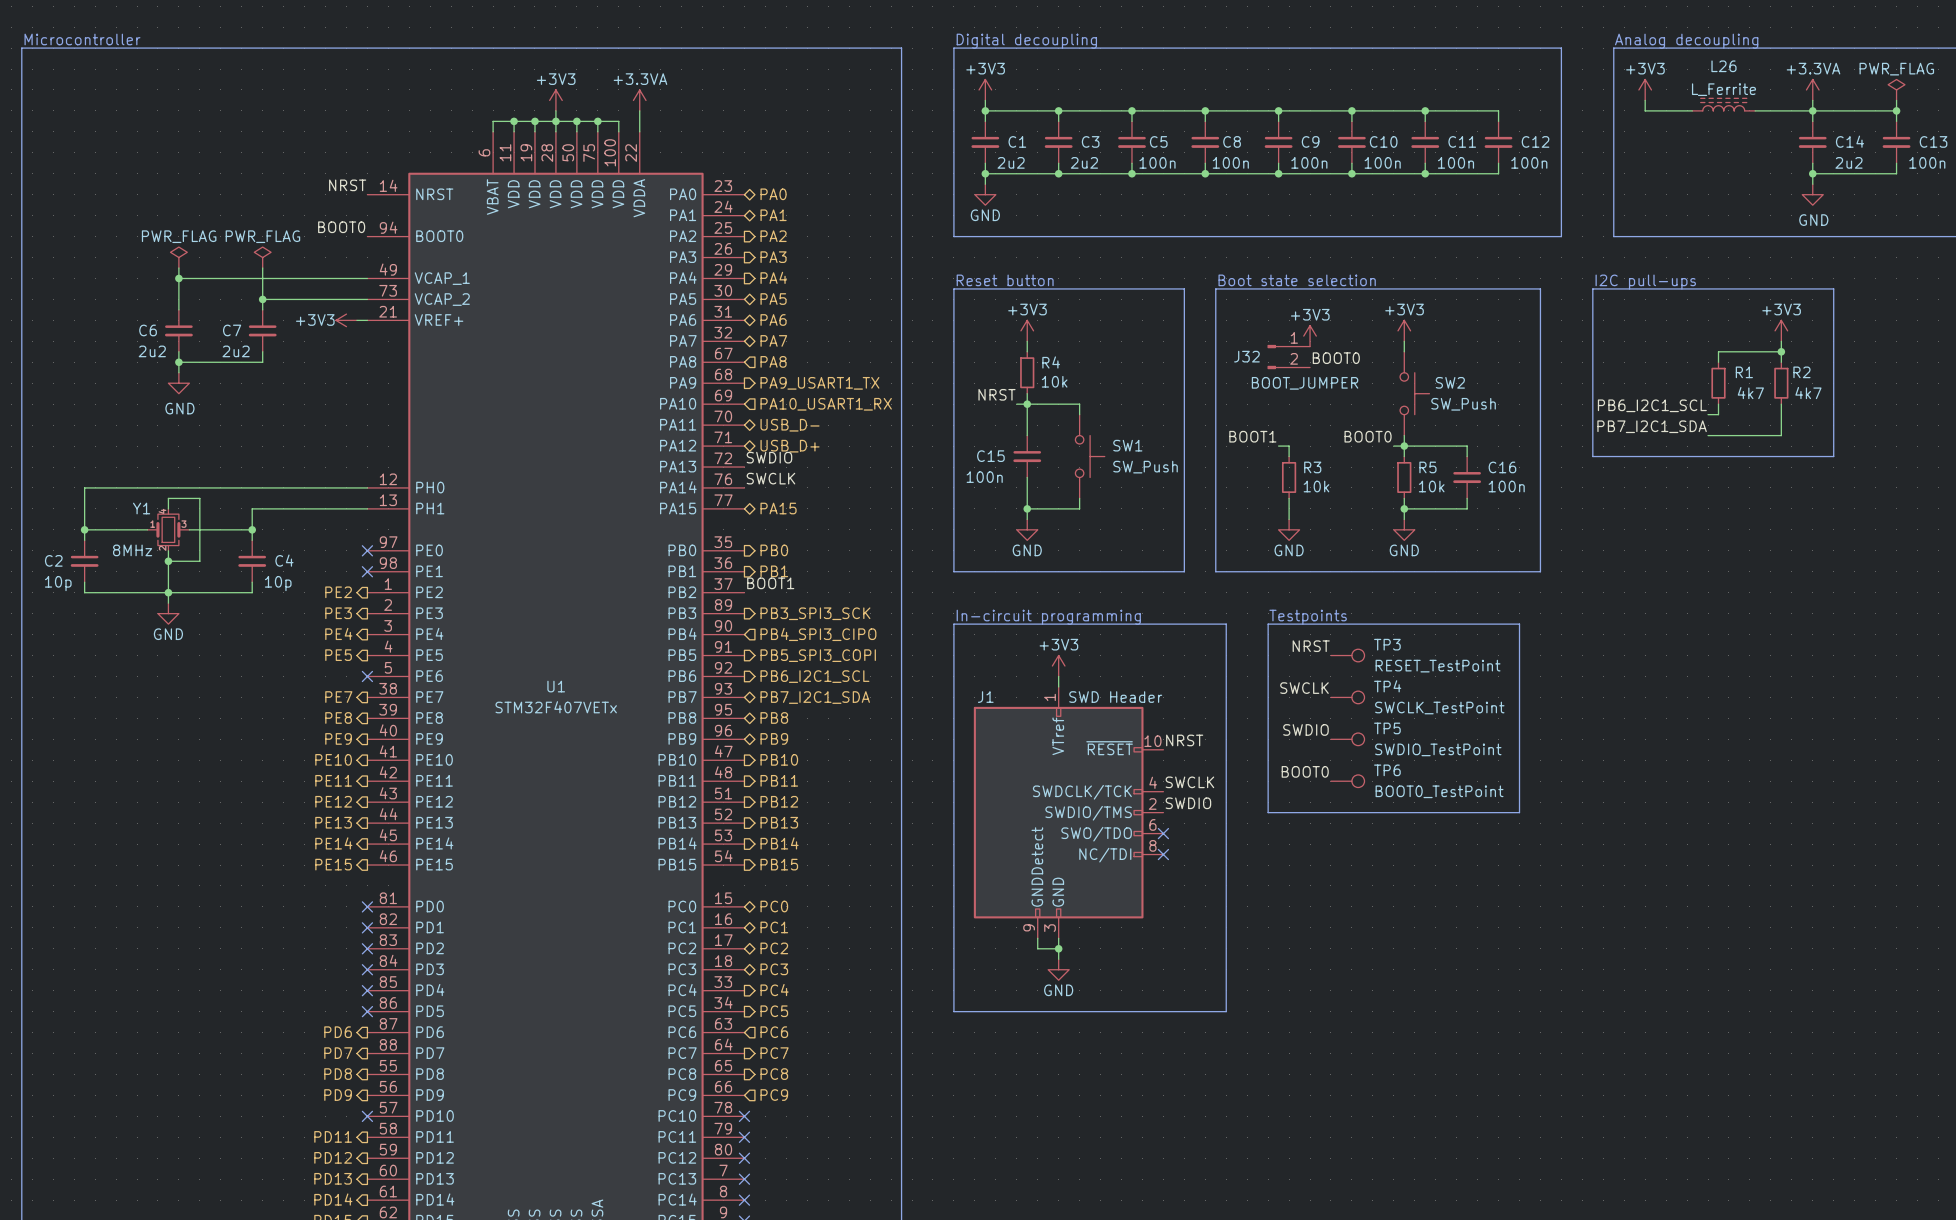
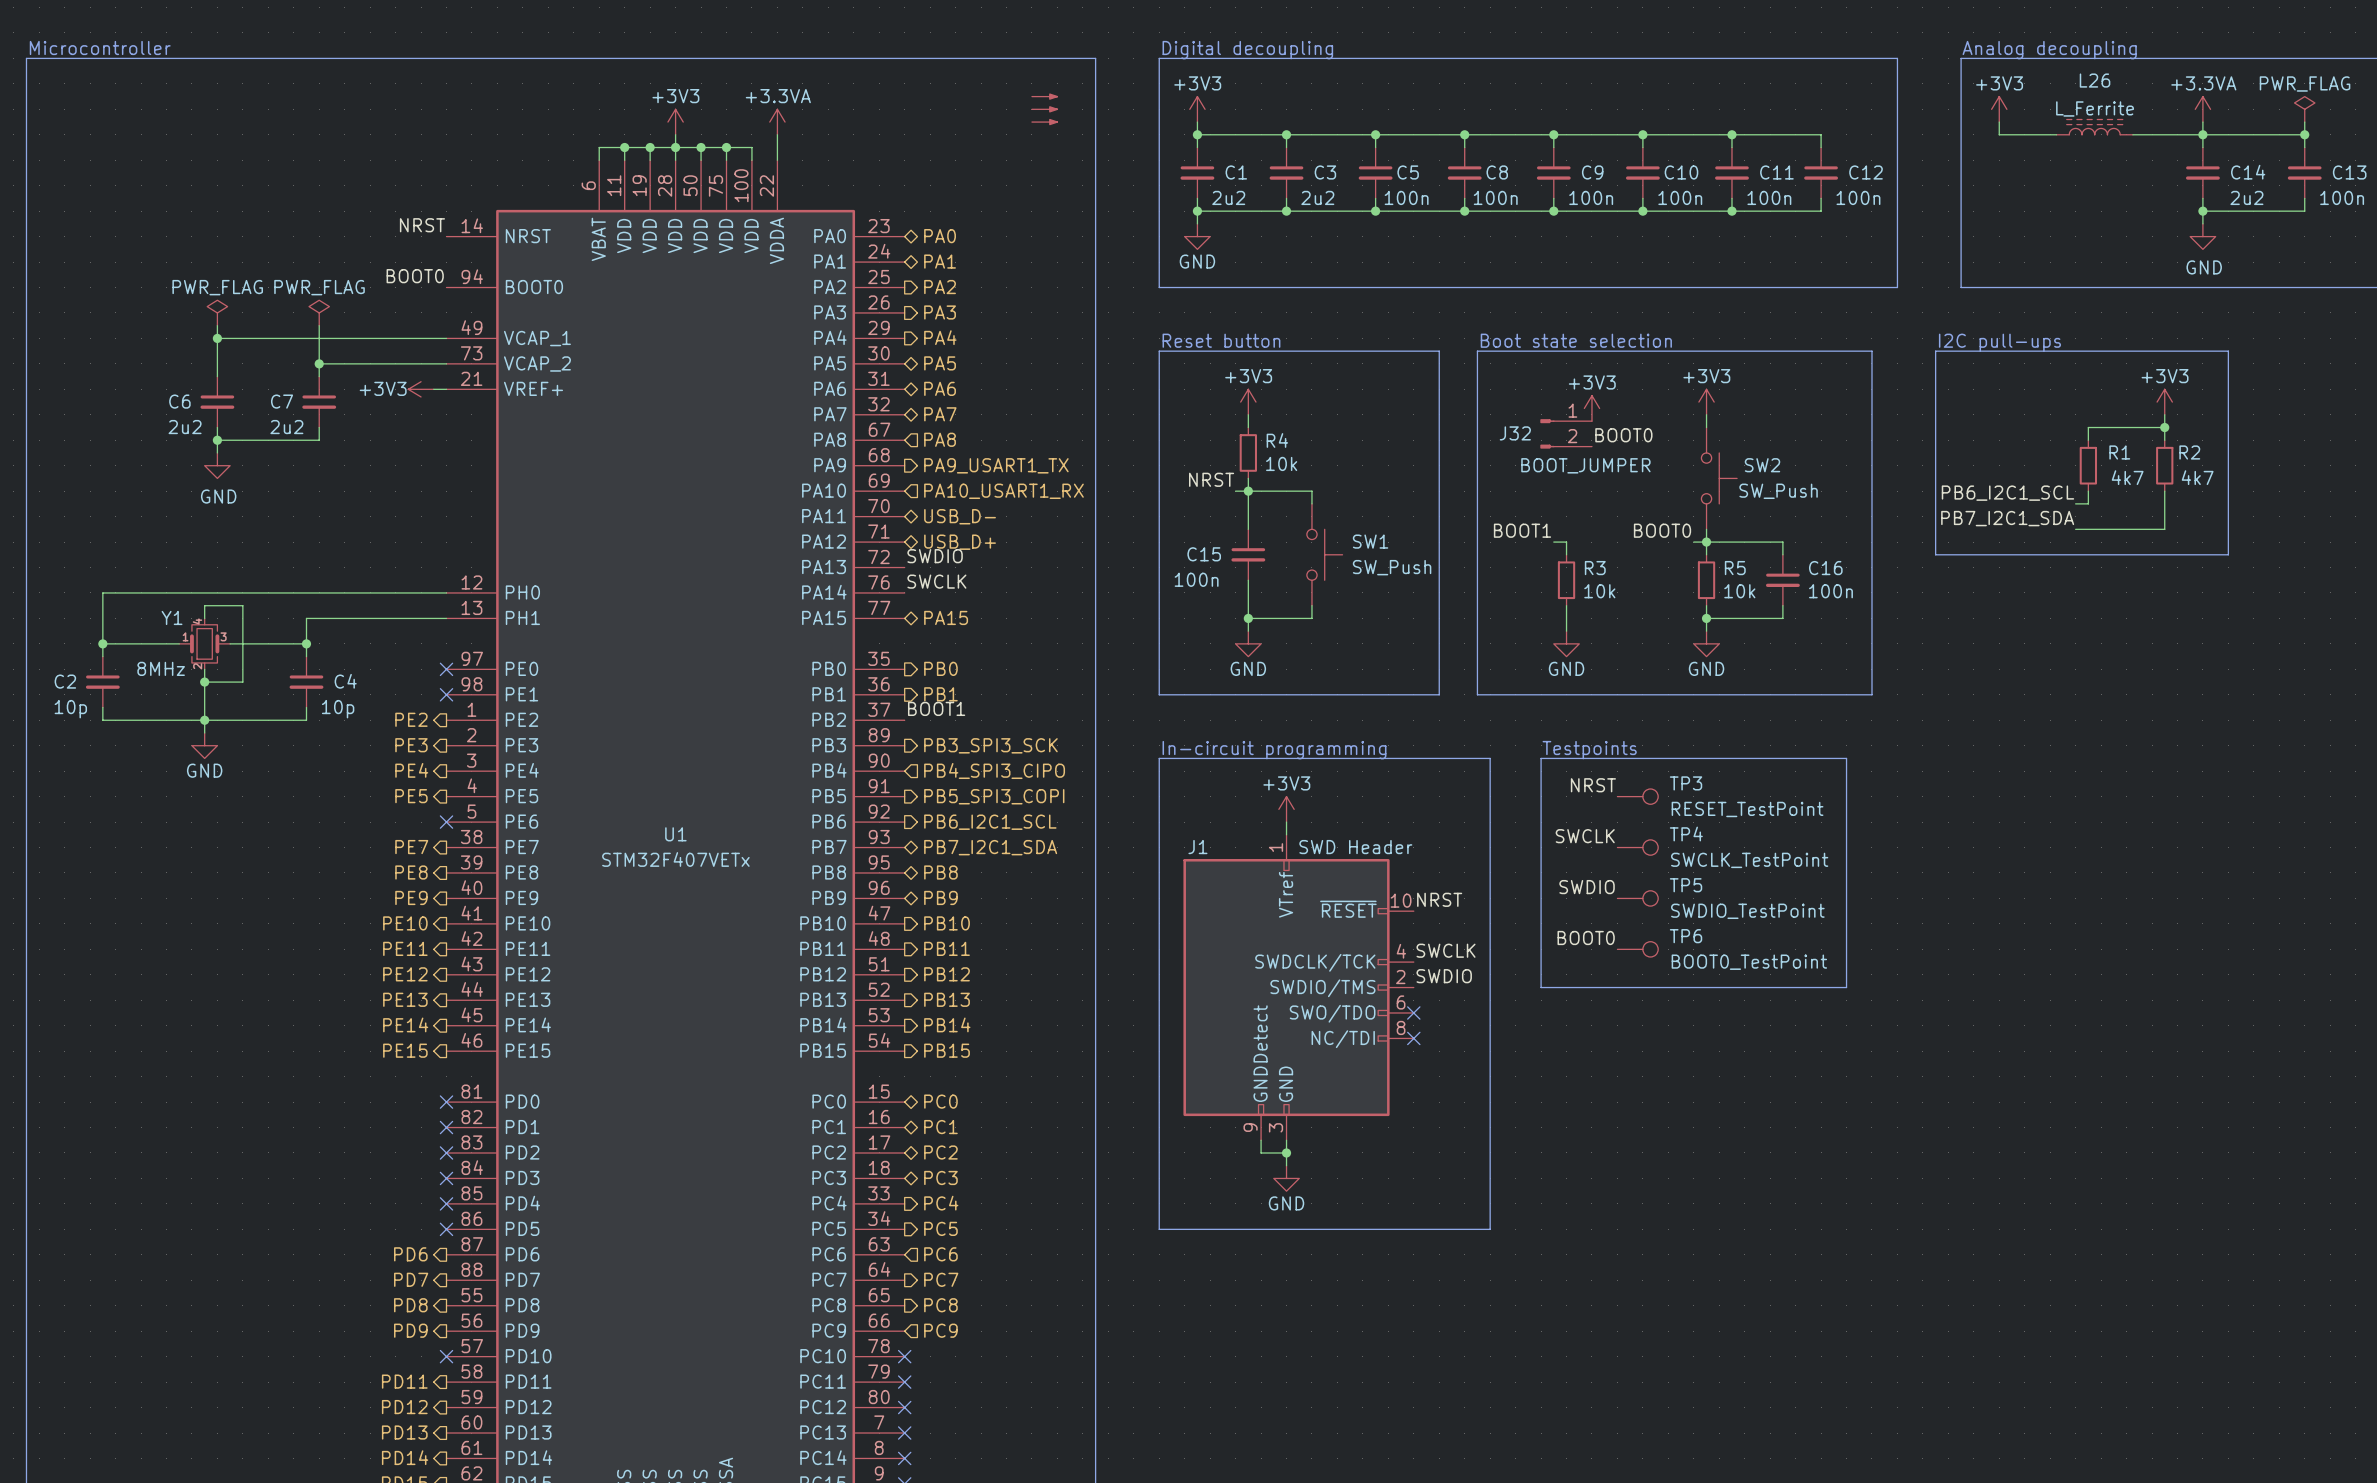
part: none -> (1044, 96)
part: none -> (1044, 109)
part: none -> (1044, 122)

